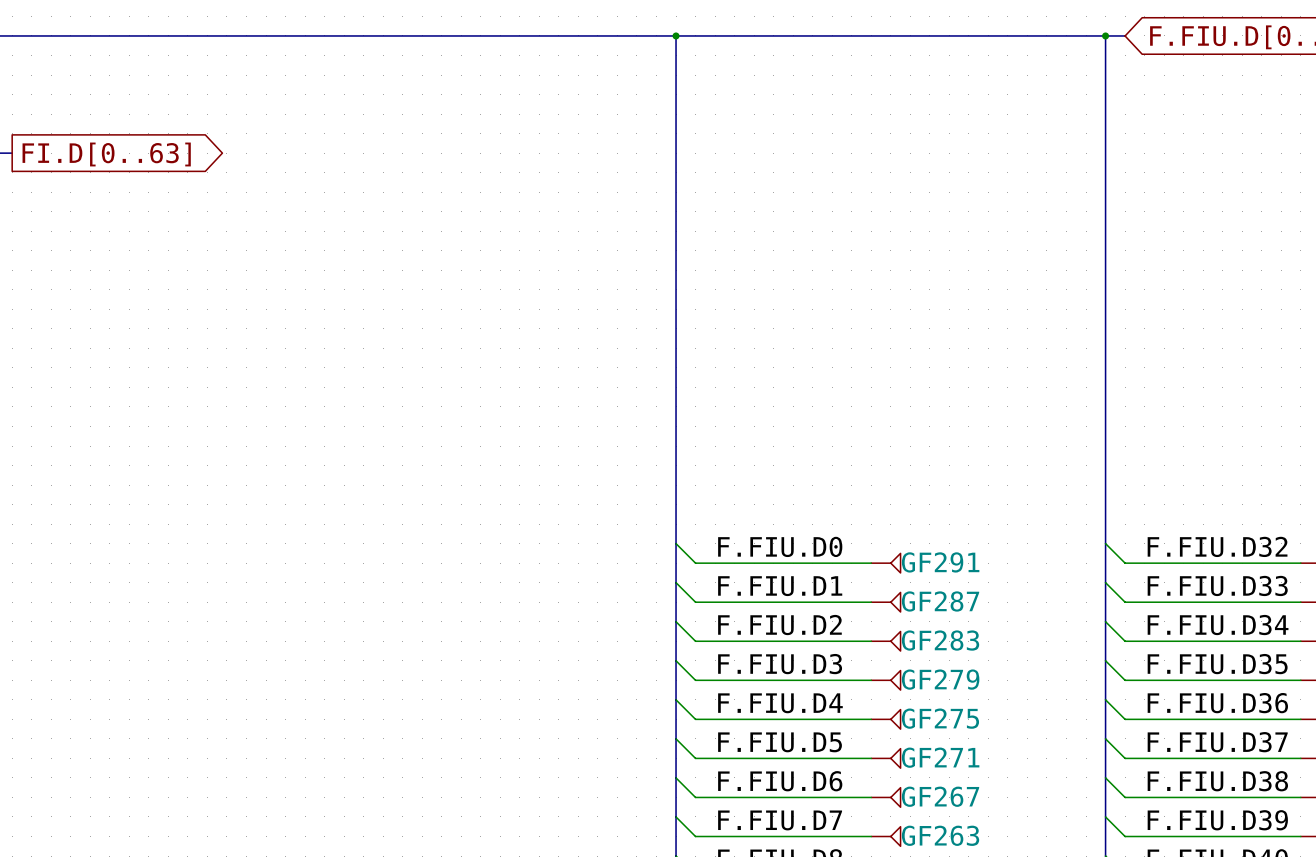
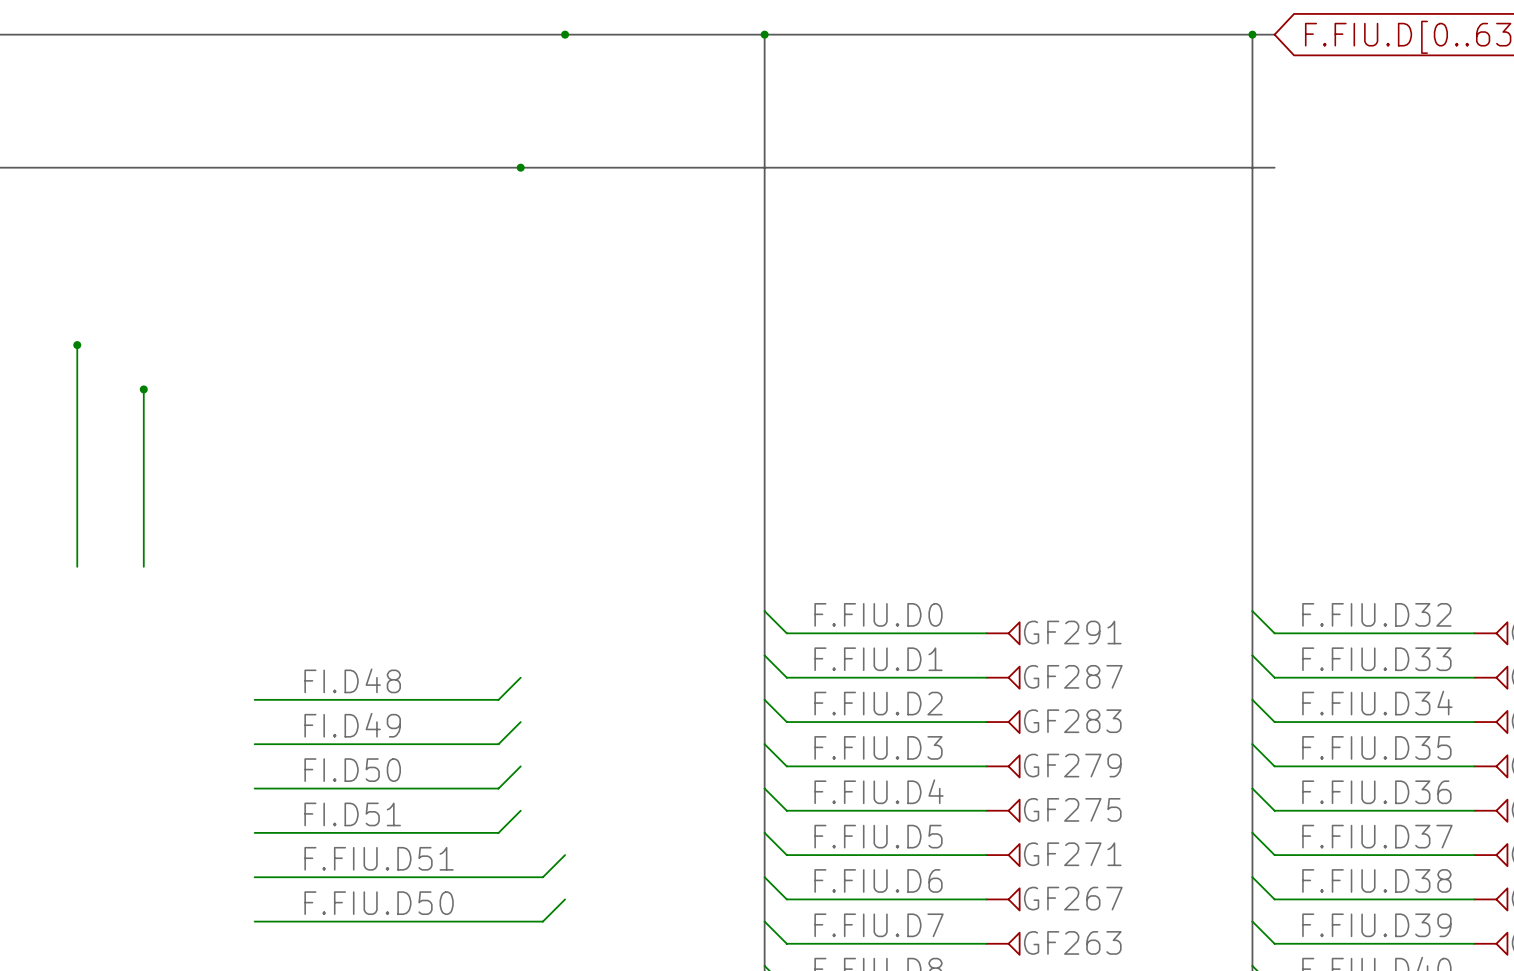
junction: none -> (565, 34)
bus: none -> (10, 167) (1274, 167)
junction: none -> (520, 167)
global label: FI.D[0..63] (106, 154) -> none
wire: none -> (77, 345) (77, 566)
junction: none -> (77, 345)
wire: none -> (143, 389) (143, 566)
junction: none -> (143, 389)
wire: none -> (520, 677) (498, 699) (254, 699)
label: none -> FI.D48 (352, 680)
wire: none -> (520, 722) (498, 744) (254, 744)
label: none -> FI.D49 (352, 725)
wire: none -> (520, 766) (498, 788) (254, 788)
label: none -> FI.D50 (352, 770)
wire: none -> (520, 810) (498, 832) (254, 832)
label: none -> FI.D51 (352, 814)
wire: none -> (565, 855) (542, 877) (254, 877)
label: none -> F.FIU.D51 (379, 858)
wire: none -> (565, 899) (542, 921) (254, 921)
label: none -> F.FIU.D50 (379, 903)

